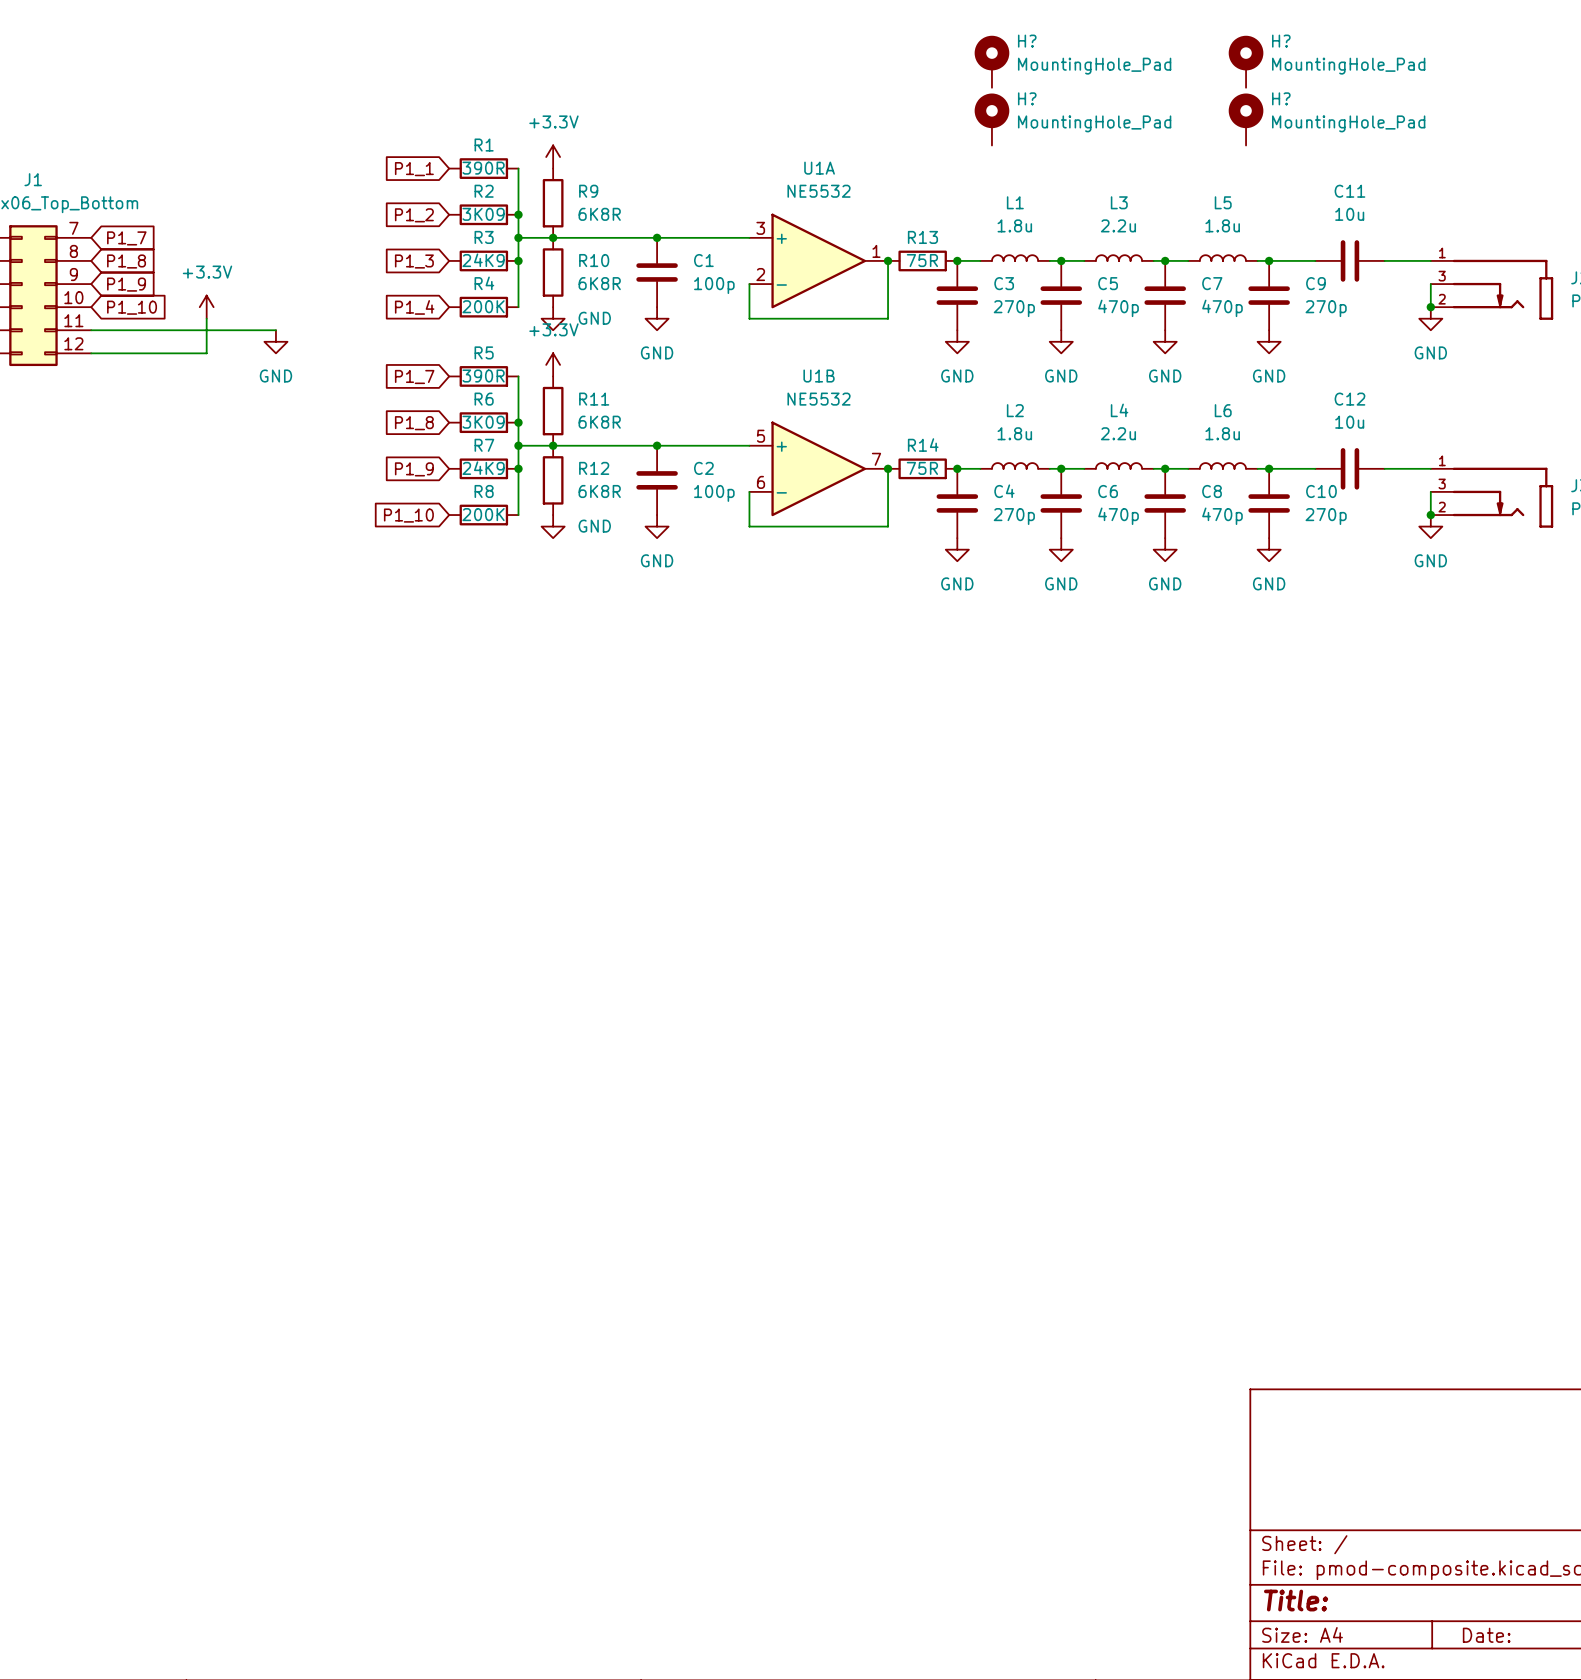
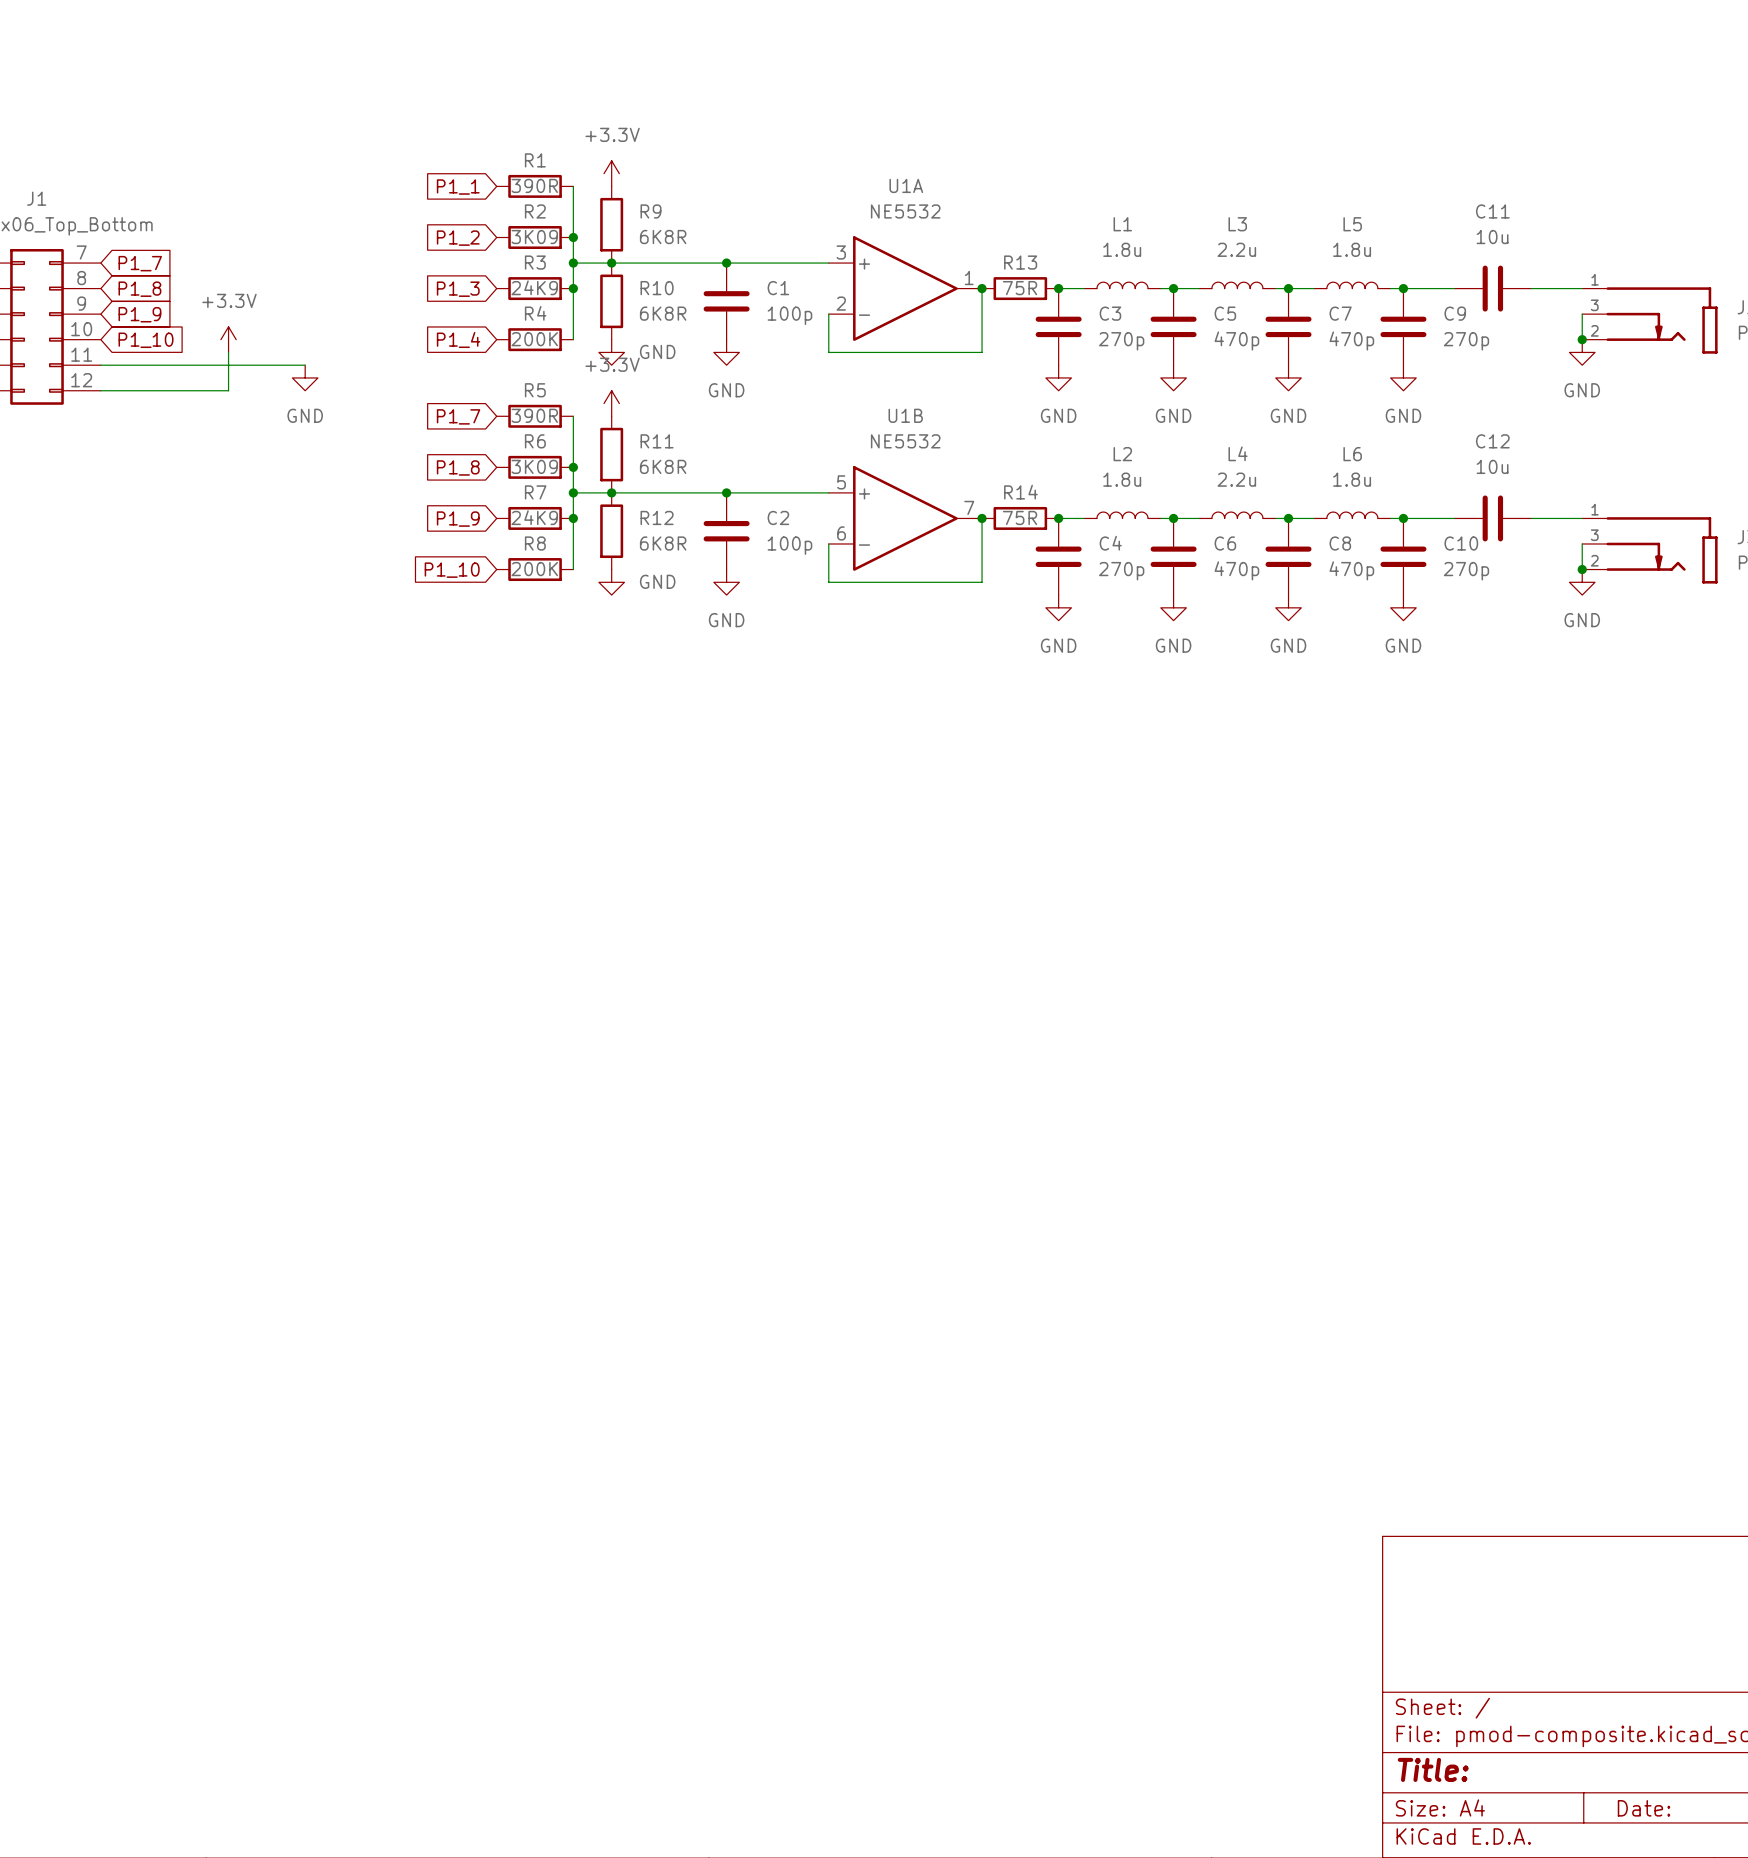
H?: MountingHole_Pad (991, 61) -> none
H?: MountingHole_Pad (1246, 61) -> none
H?: MountingHole_Pad (991, 119) -> none
H?: MountingHole_Pad (1246, 119) -> none

